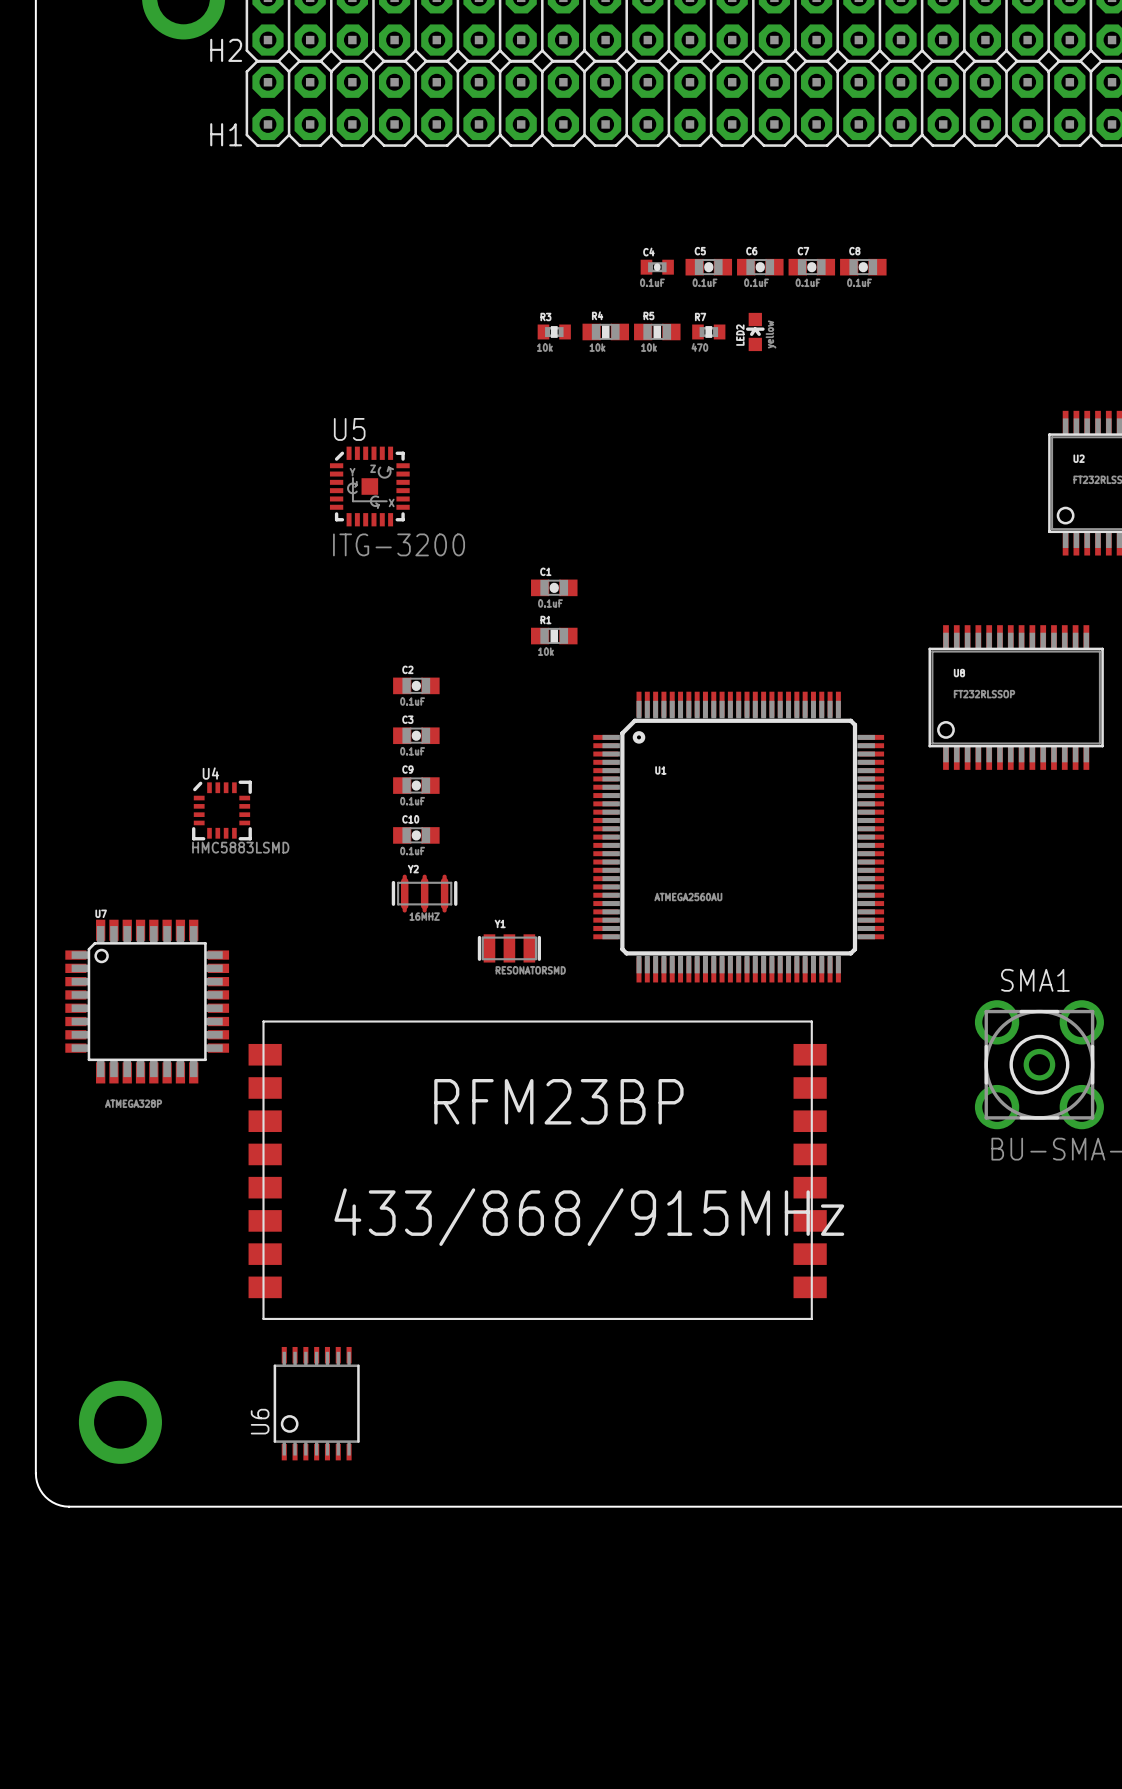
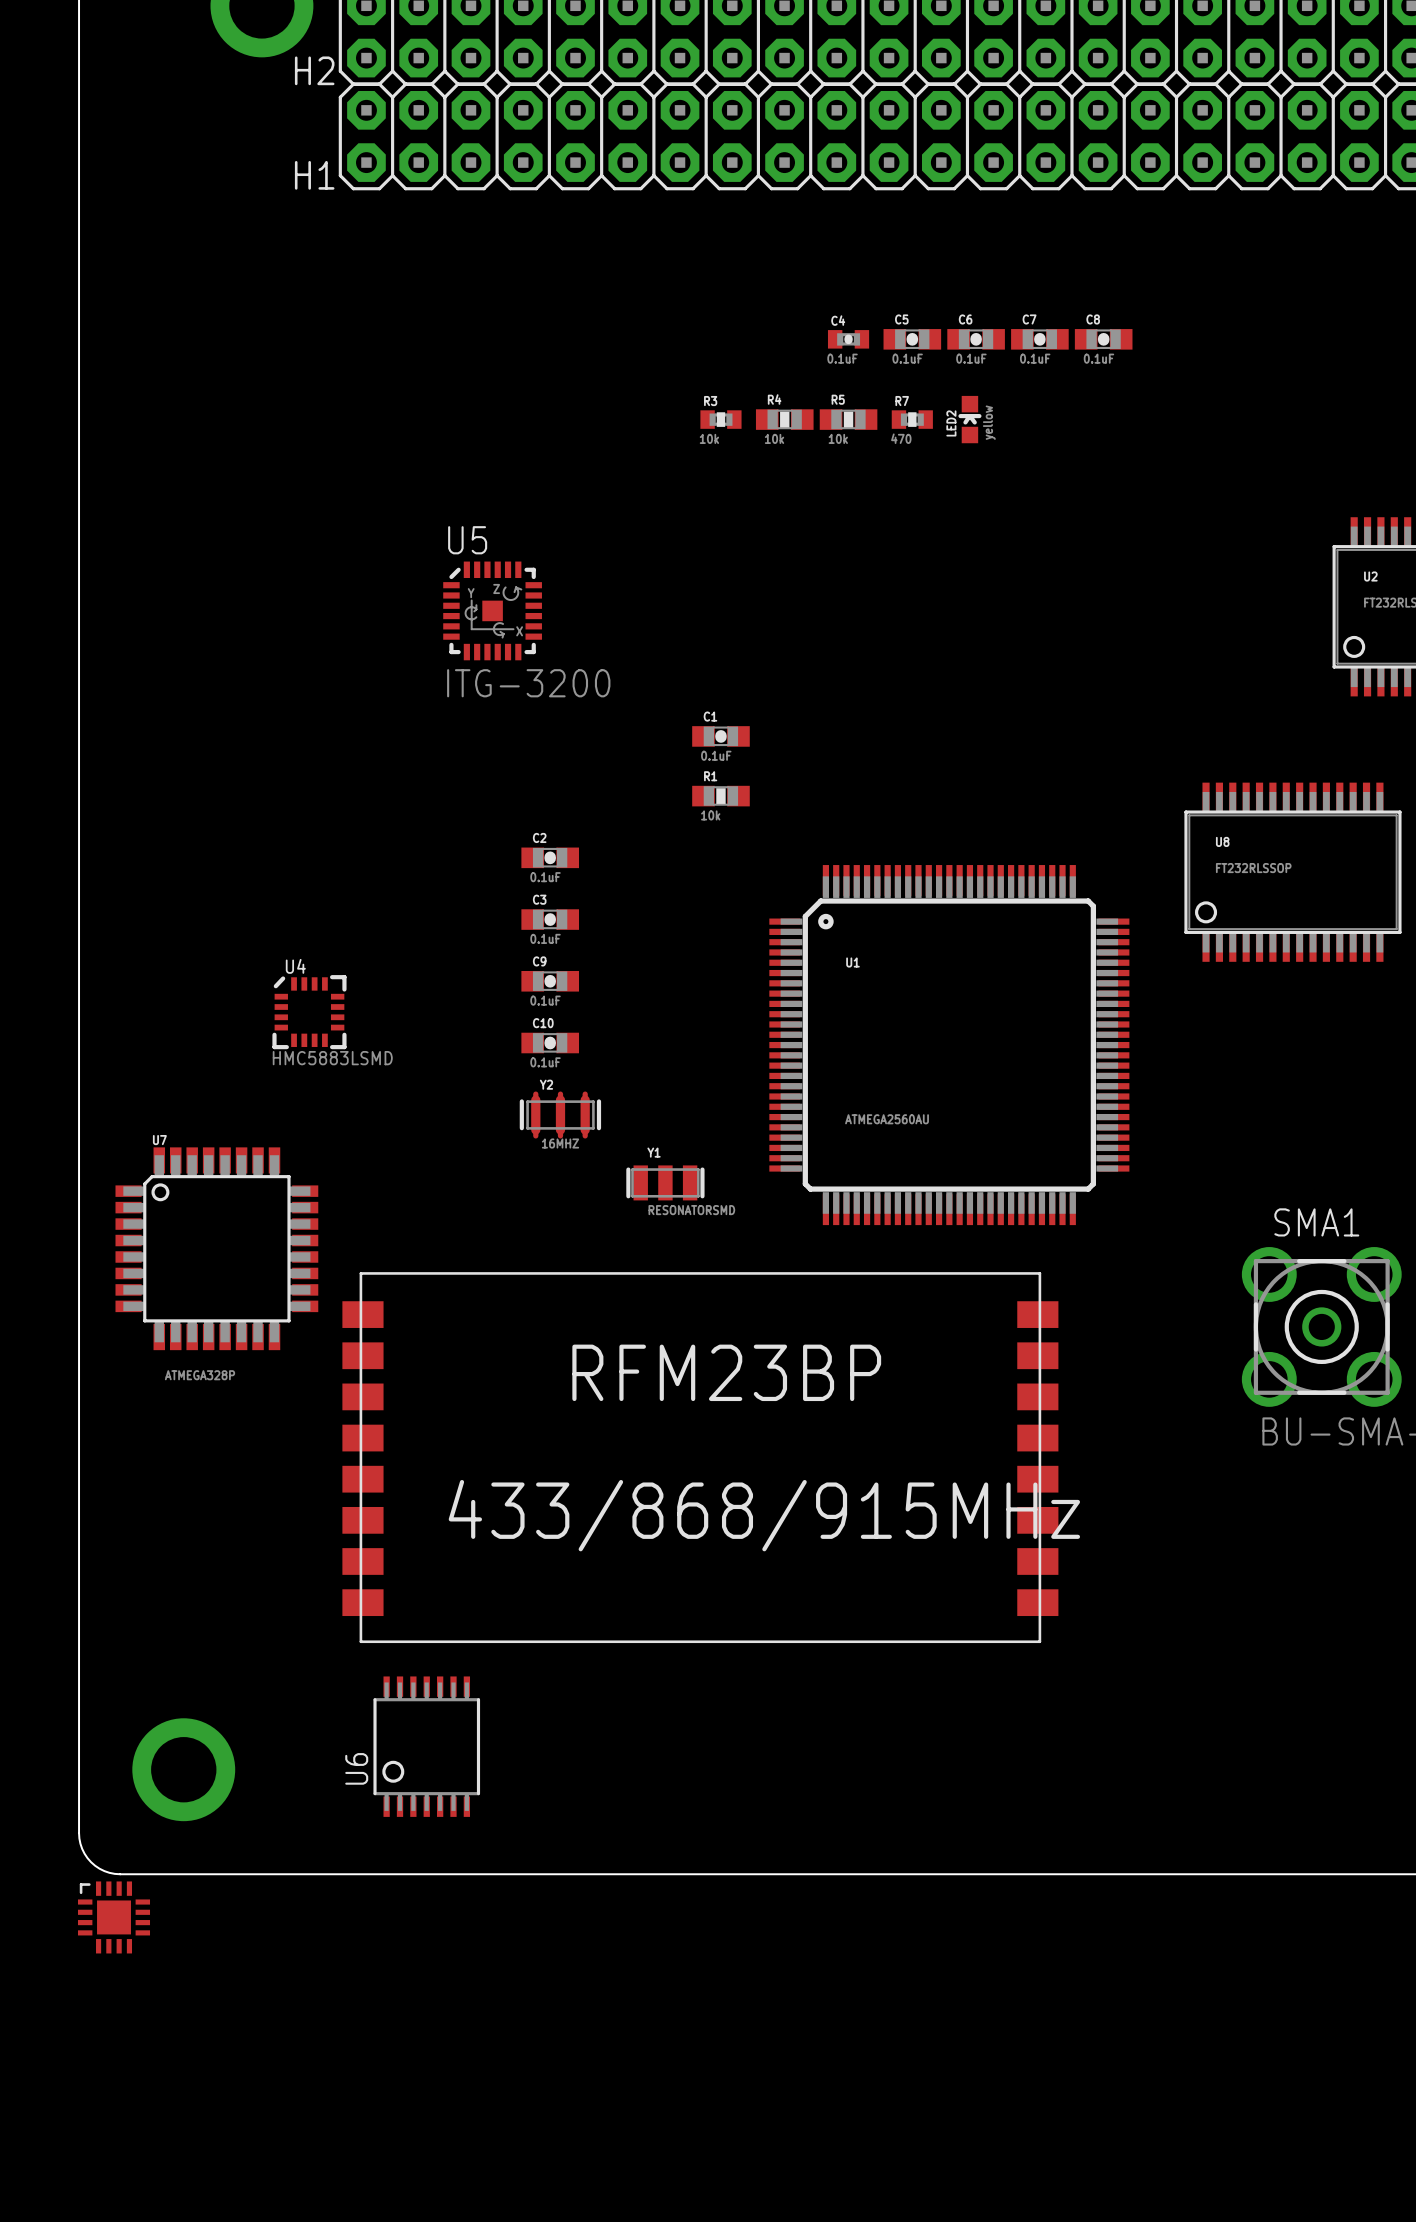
part: none -> (114, 1917)

